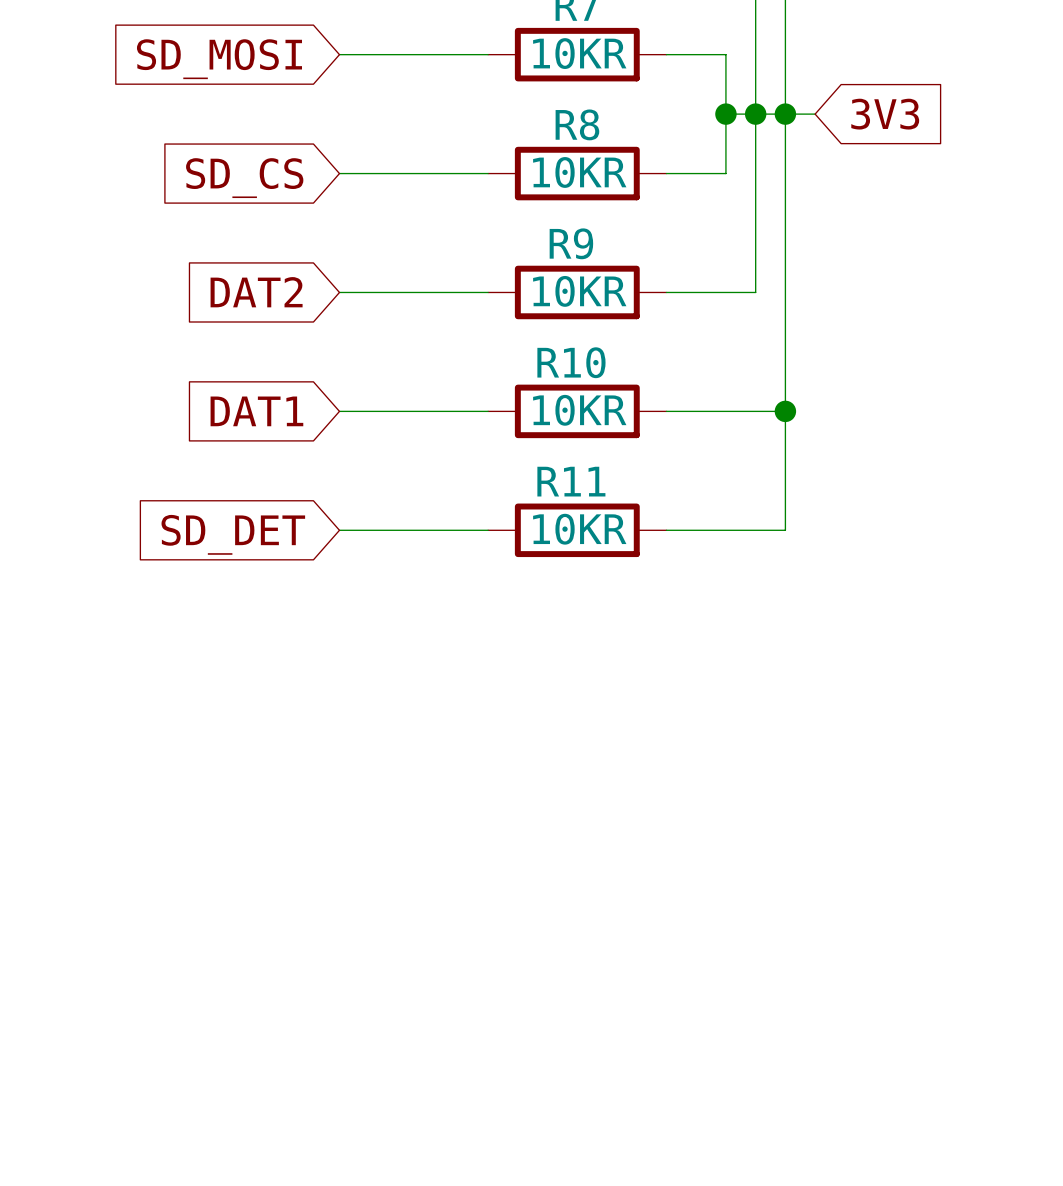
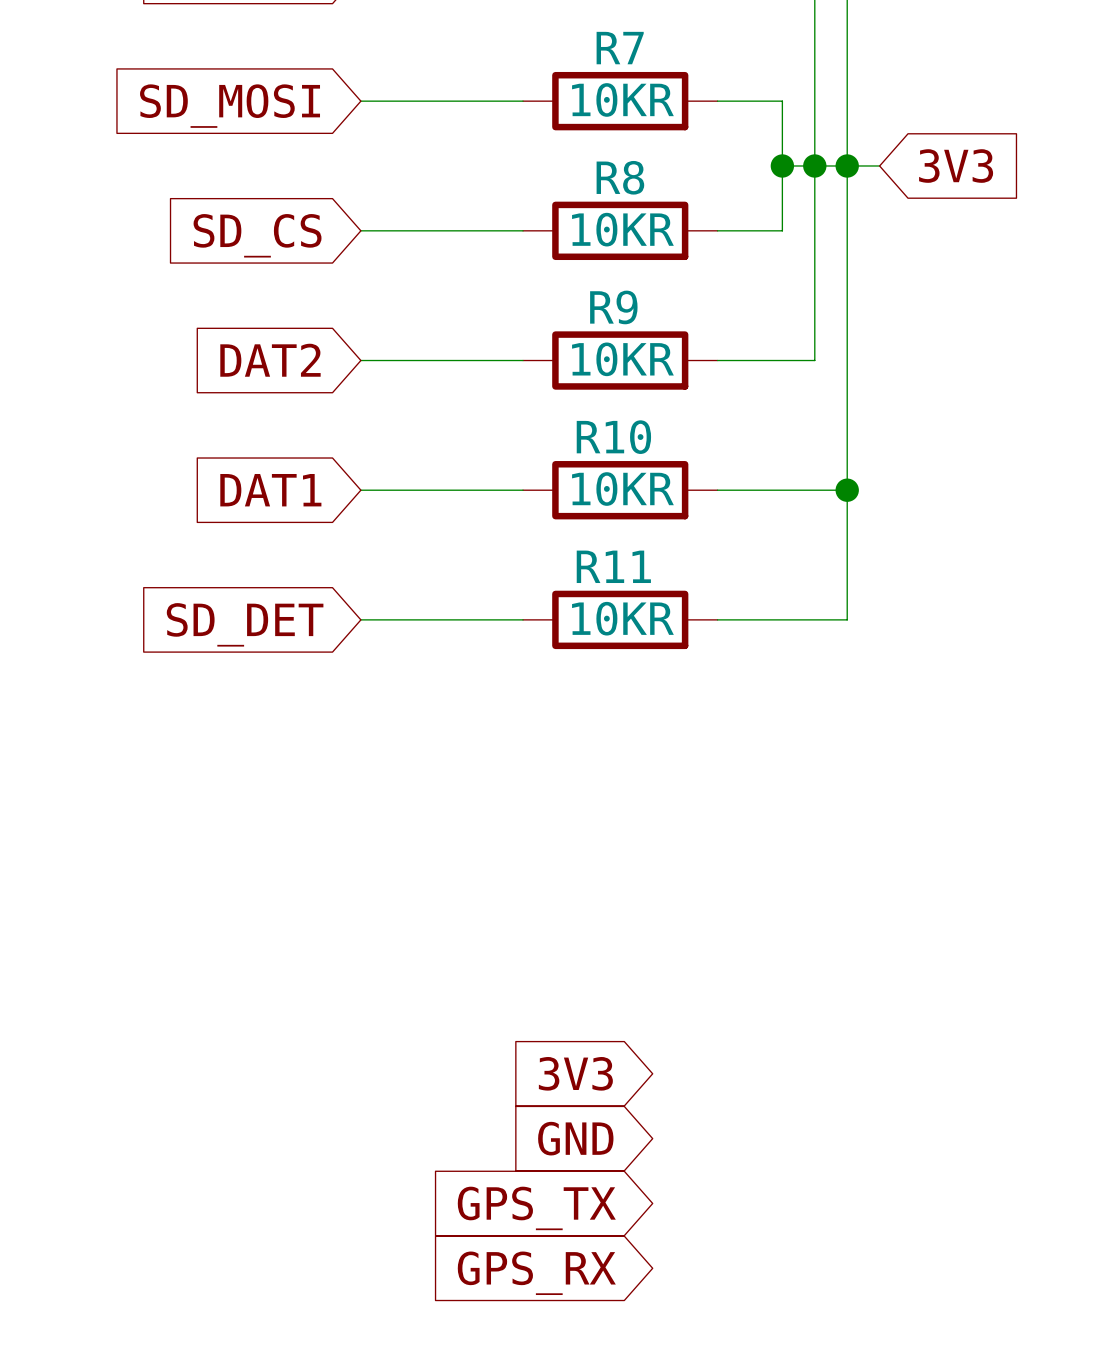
global label: none -> 3V3 (575, 1073)
global label: none -> GND (575, 1138)
global label: none -> GPS_TX (536, 1208)
global label: none -> GPS_RX (536, 1273)

